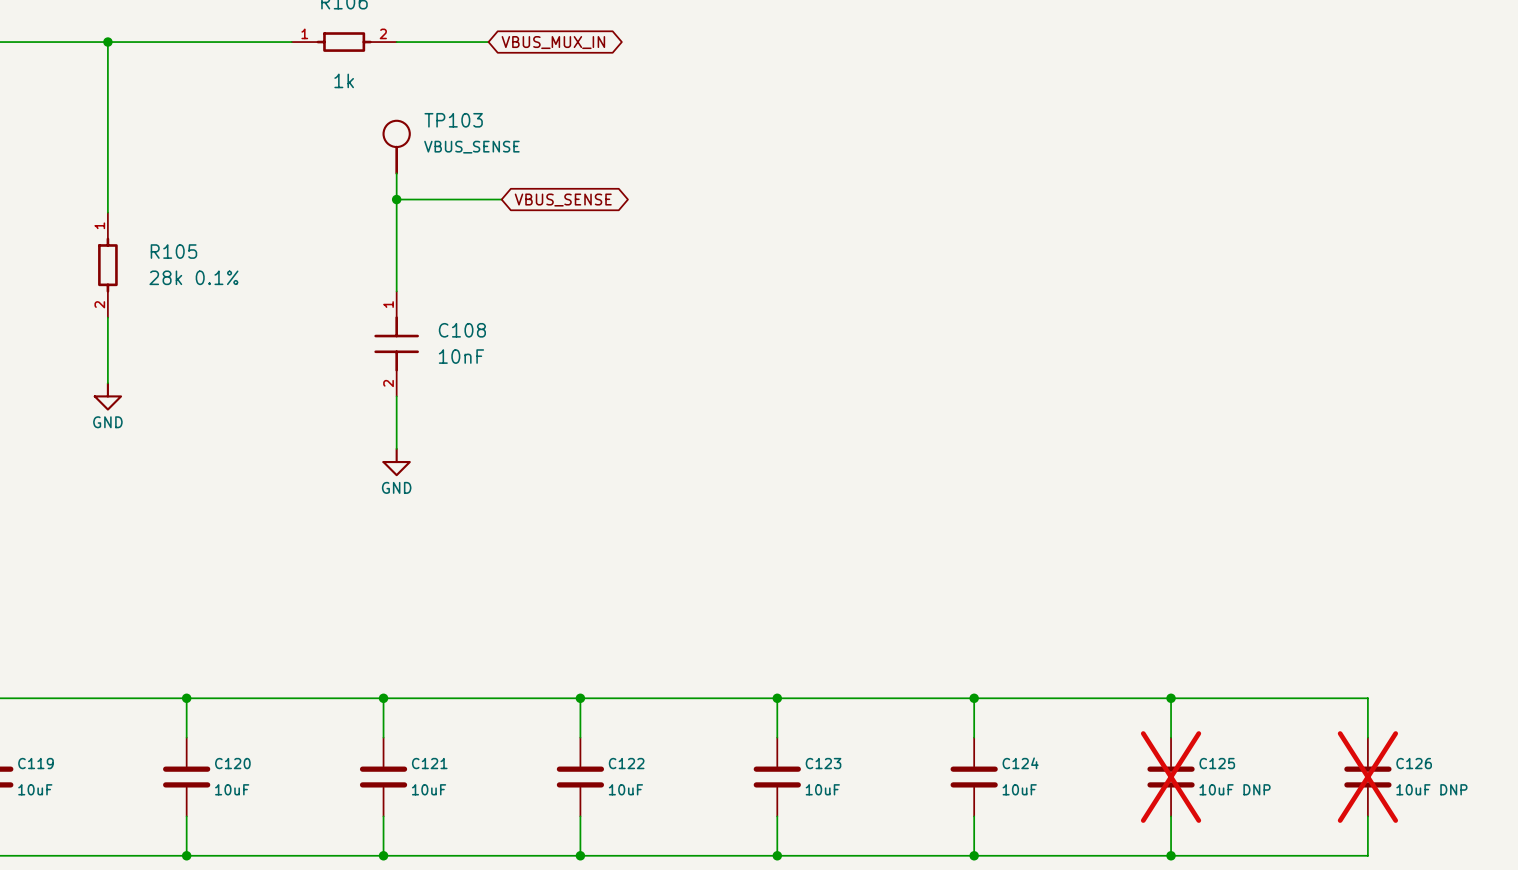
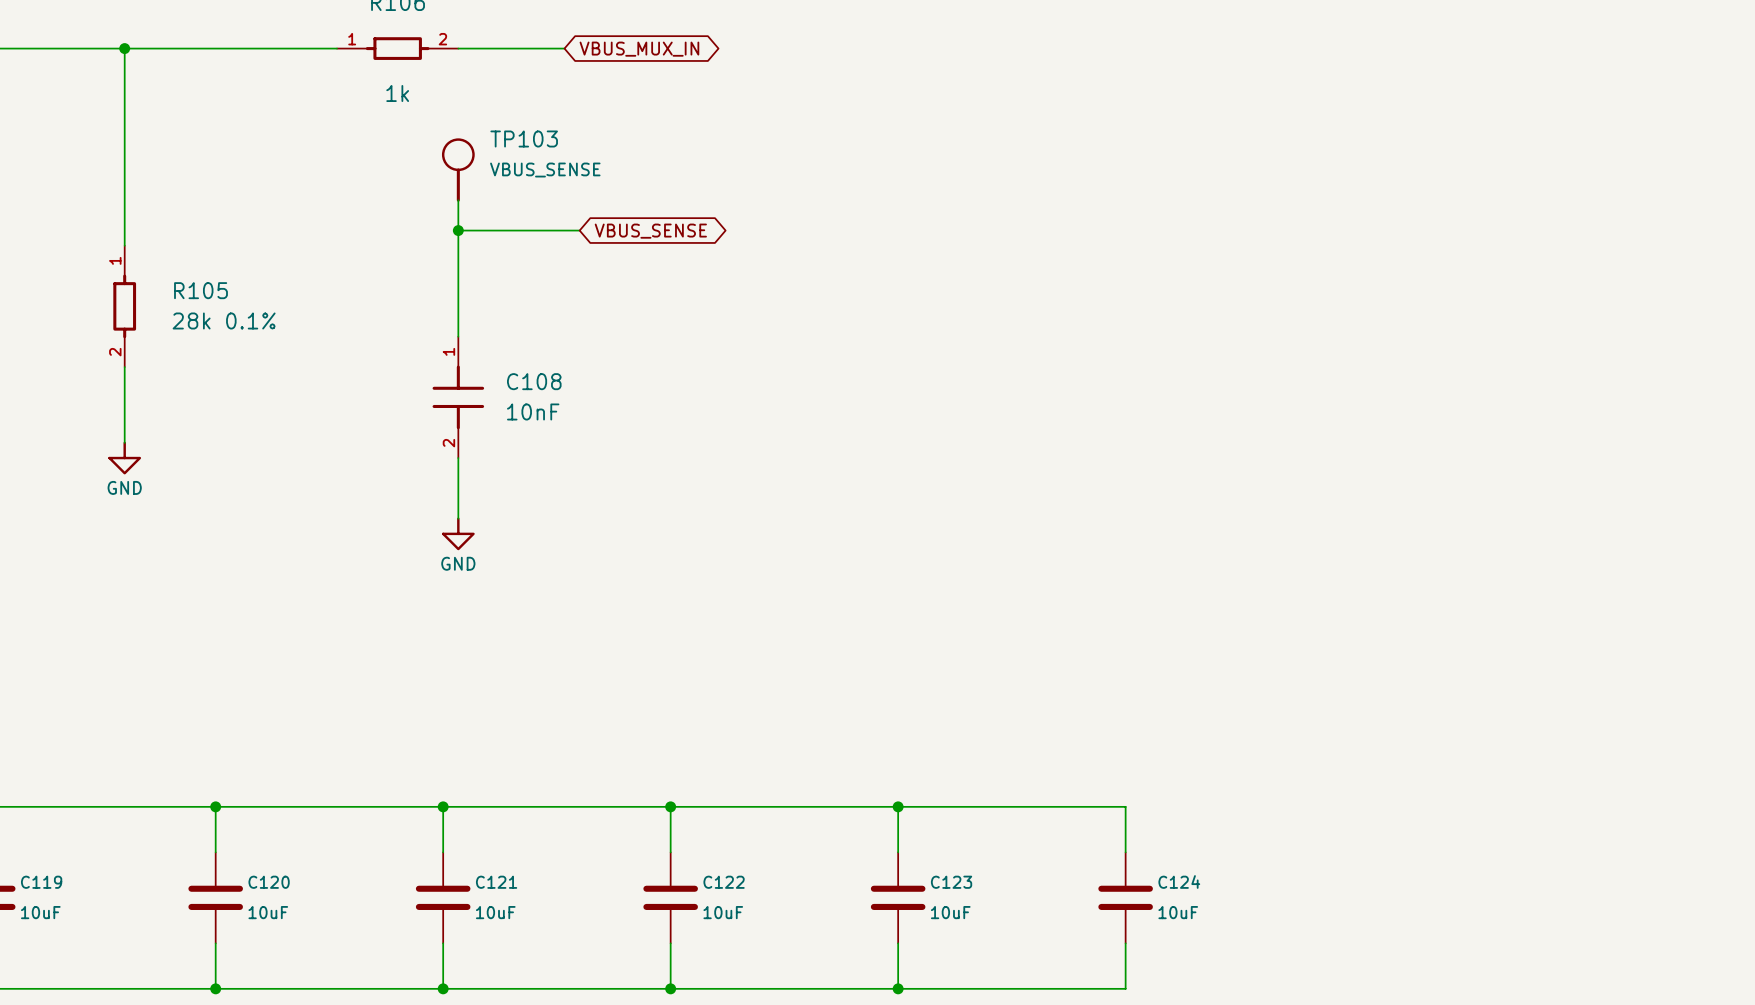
wire: (974, 698) (1367, 698) (1367, 737) -> none
junction: (974, 698) -> none
wire: (1171, 698) (1171, 737) -> none
junction: (1171, 698) -> none
C125: 10uF DNP (1171, 777) -> none
C126: 10uF DNP (1367, 777) -> none
wire: (1171, 816) (1171, 855) -> none
wire: (1367, 816) (1367, 855) (974, 855) -> none
junction: (974, 855) -> none
junction: (1171, 855) -> none

